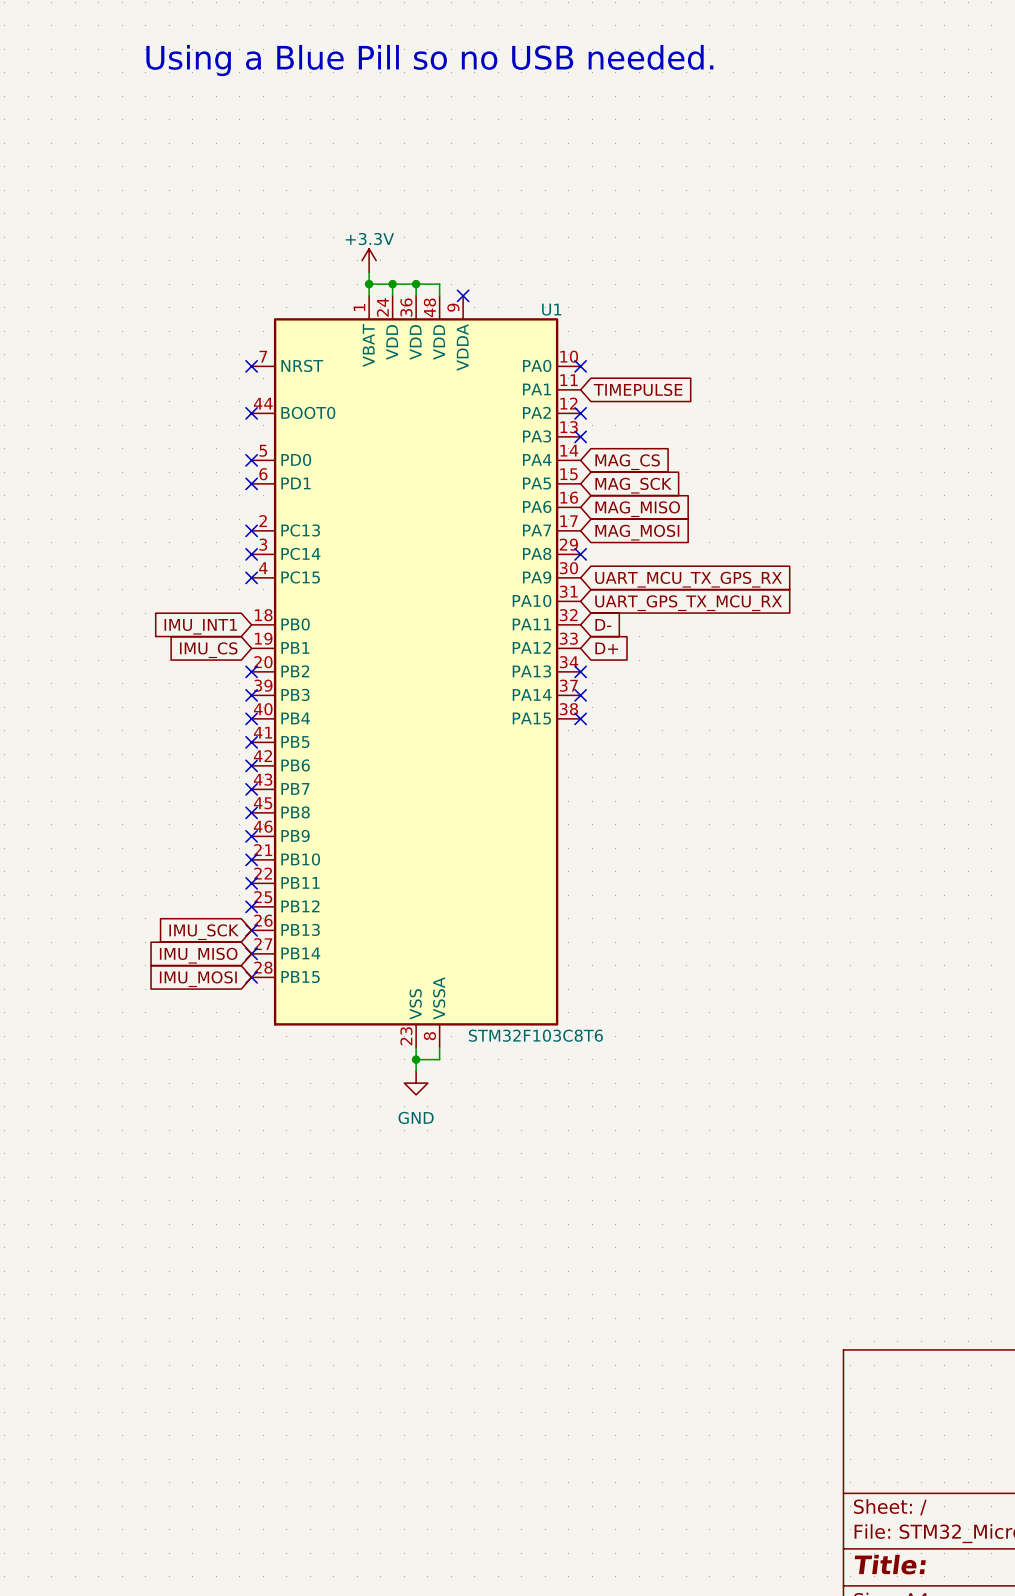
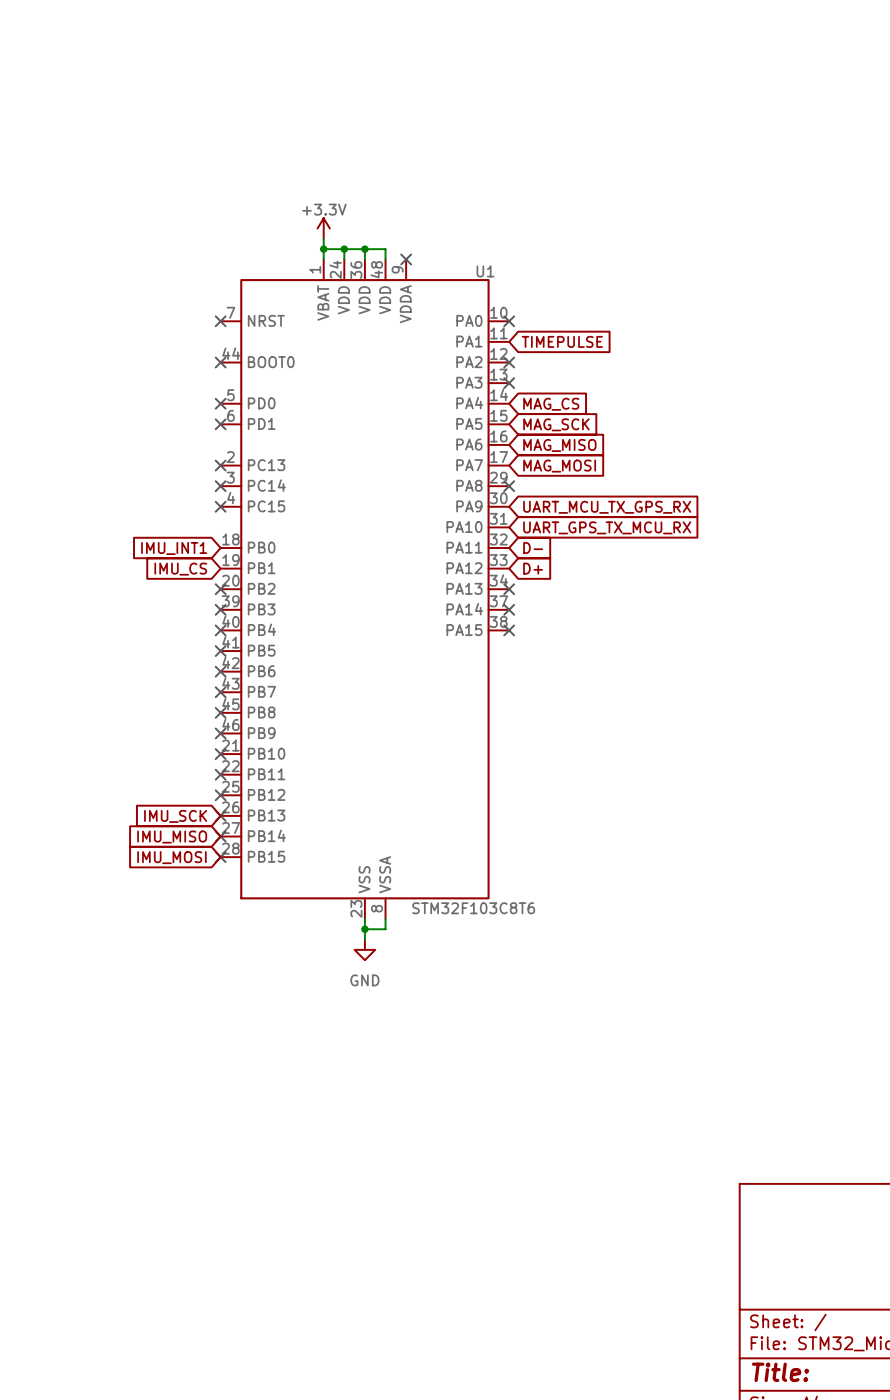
text: Using a Blue Pill so no USB needed. (429, 60) -> none

